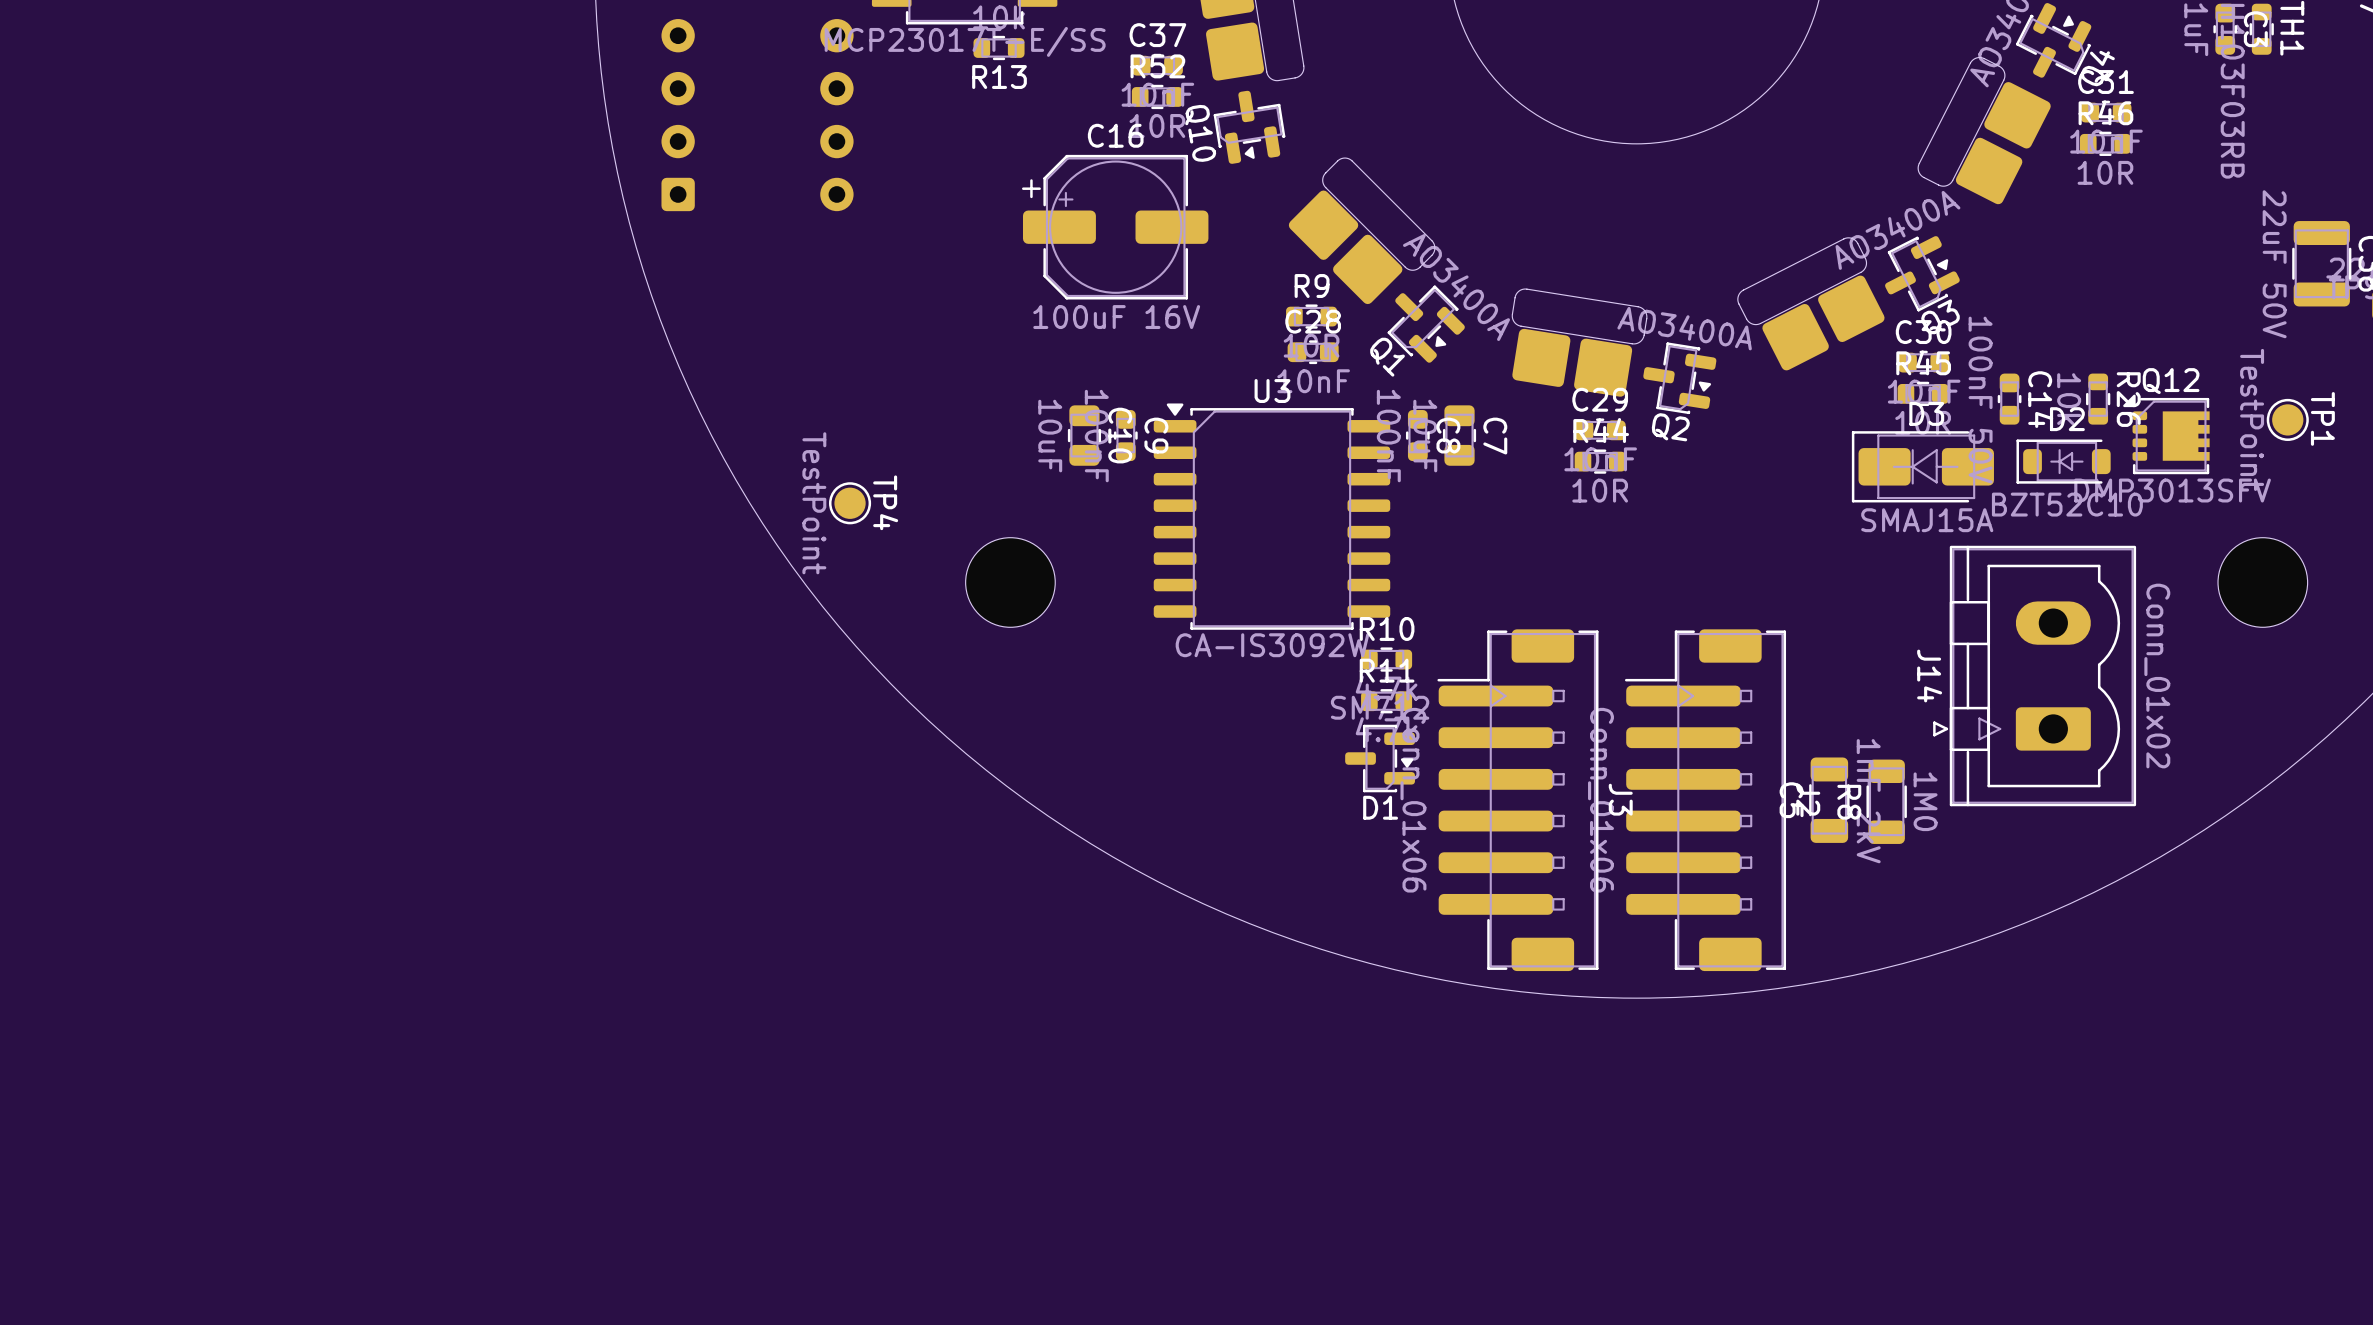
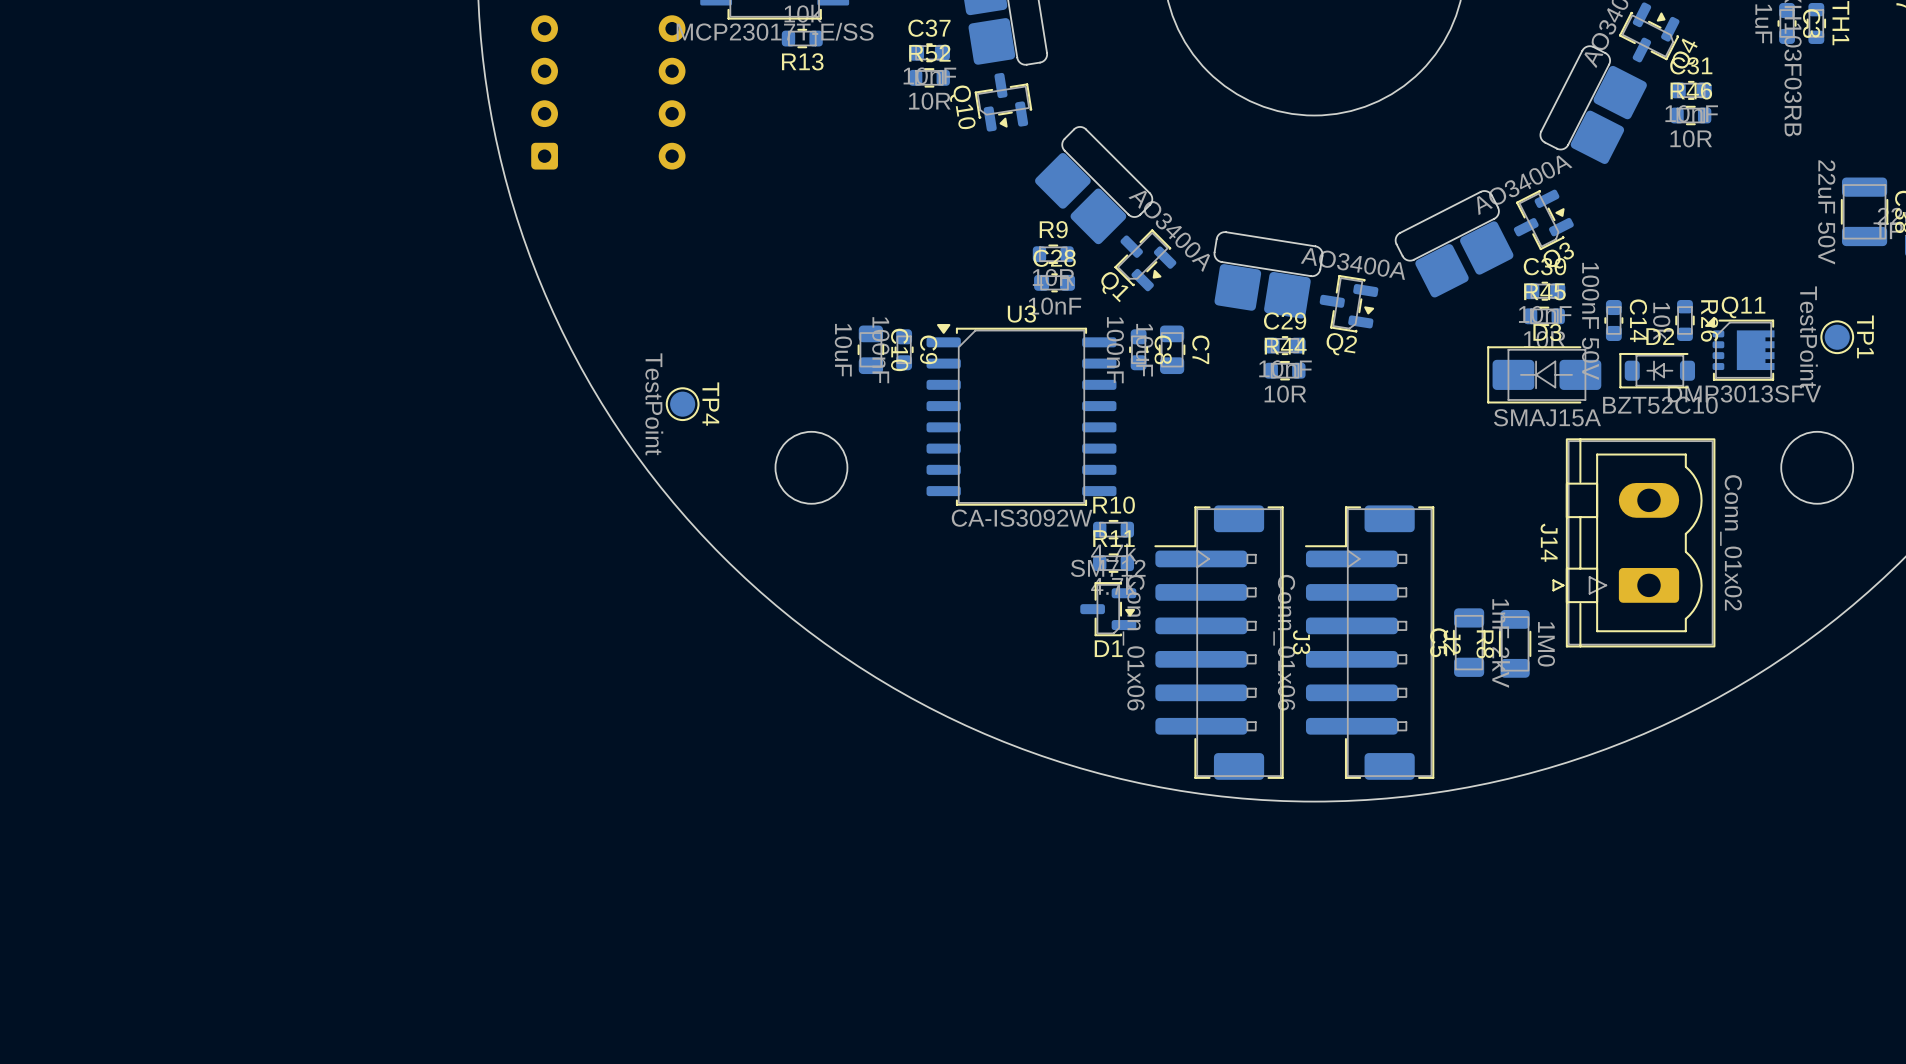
C16: 100uF 16V (1115, 227) -> none
Q12 name: Q12 (2171, 381) -> Q11 (1743, 307)

